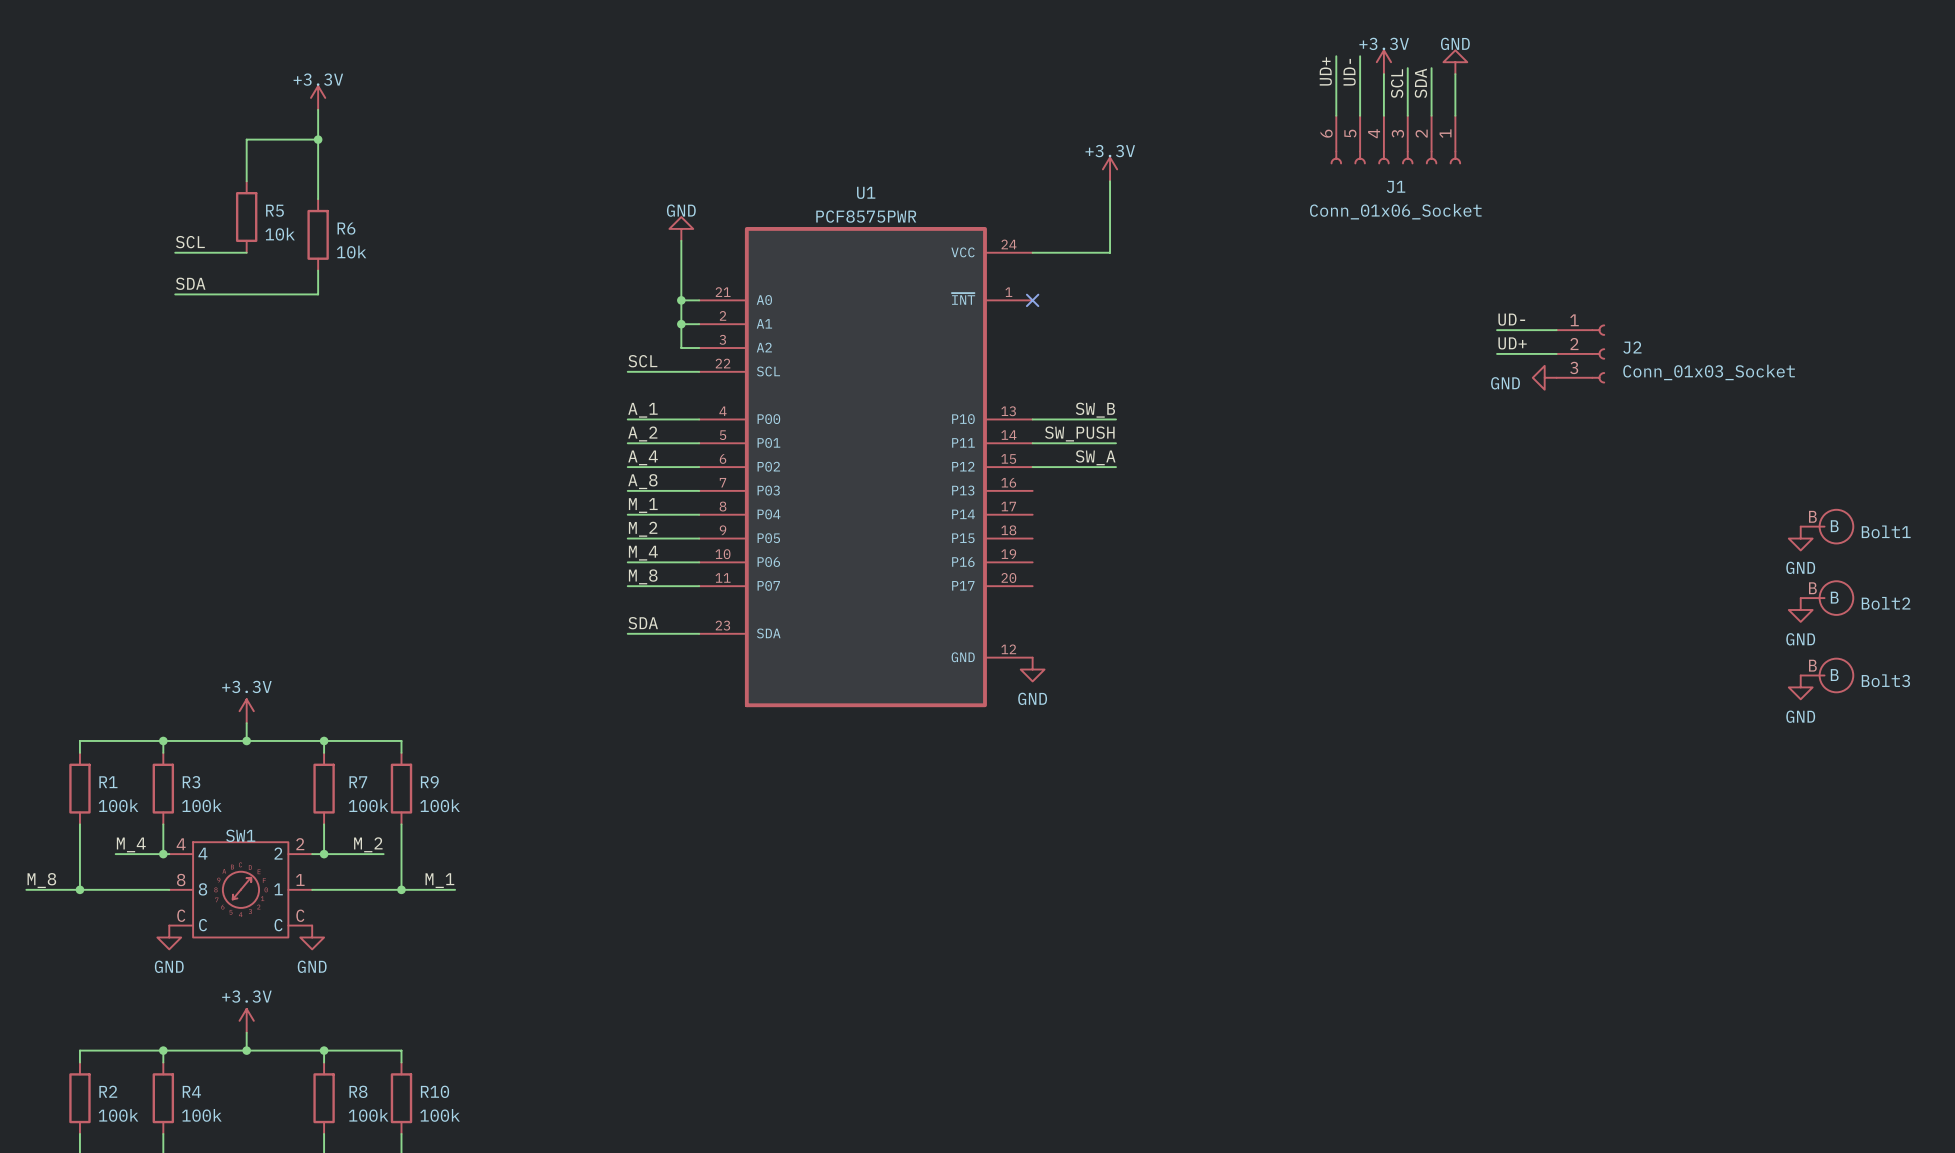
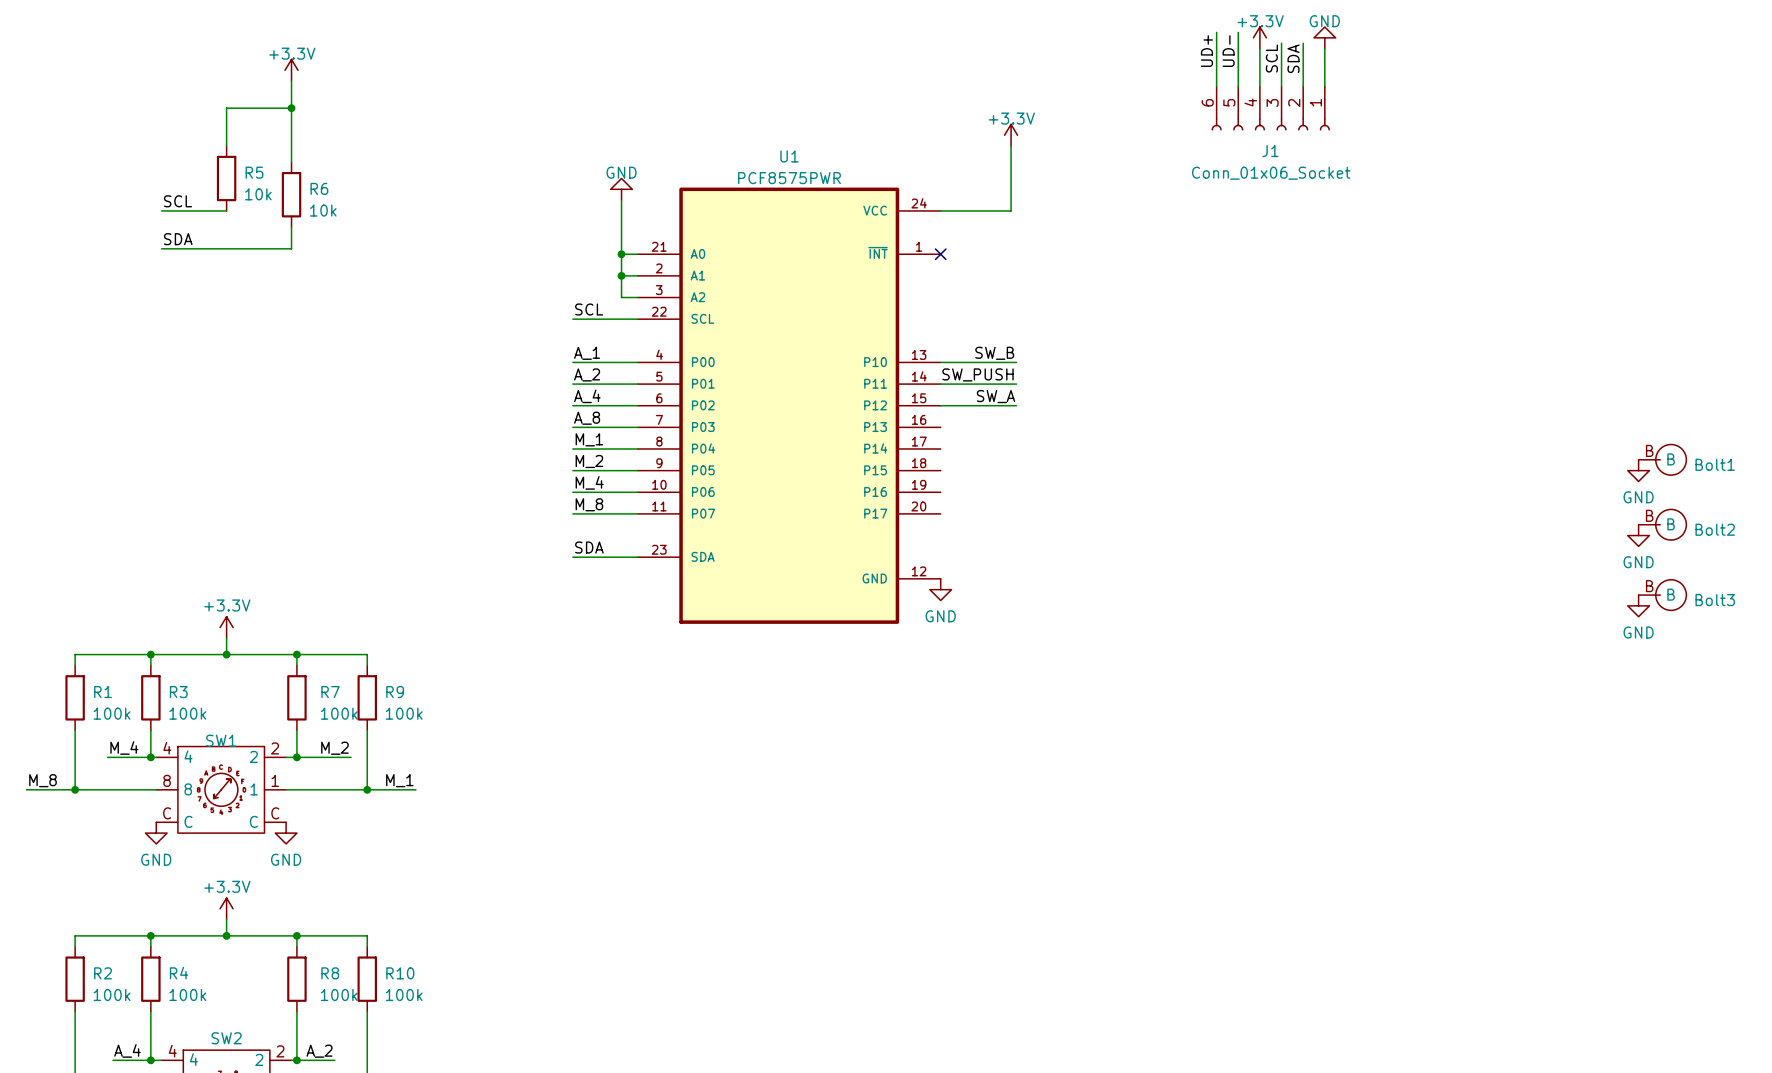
label: UD- (1511, 319) -> none
wire: (1497, 330) (1556, 330) -> none
label: UD+ (1512, 343) -> none
wire: (1497, 353) (1556, 353) -> none
J2: Conn_01x03_Socket (1580, 353) -> none
power symbol: GND (1544, 377) -> none

